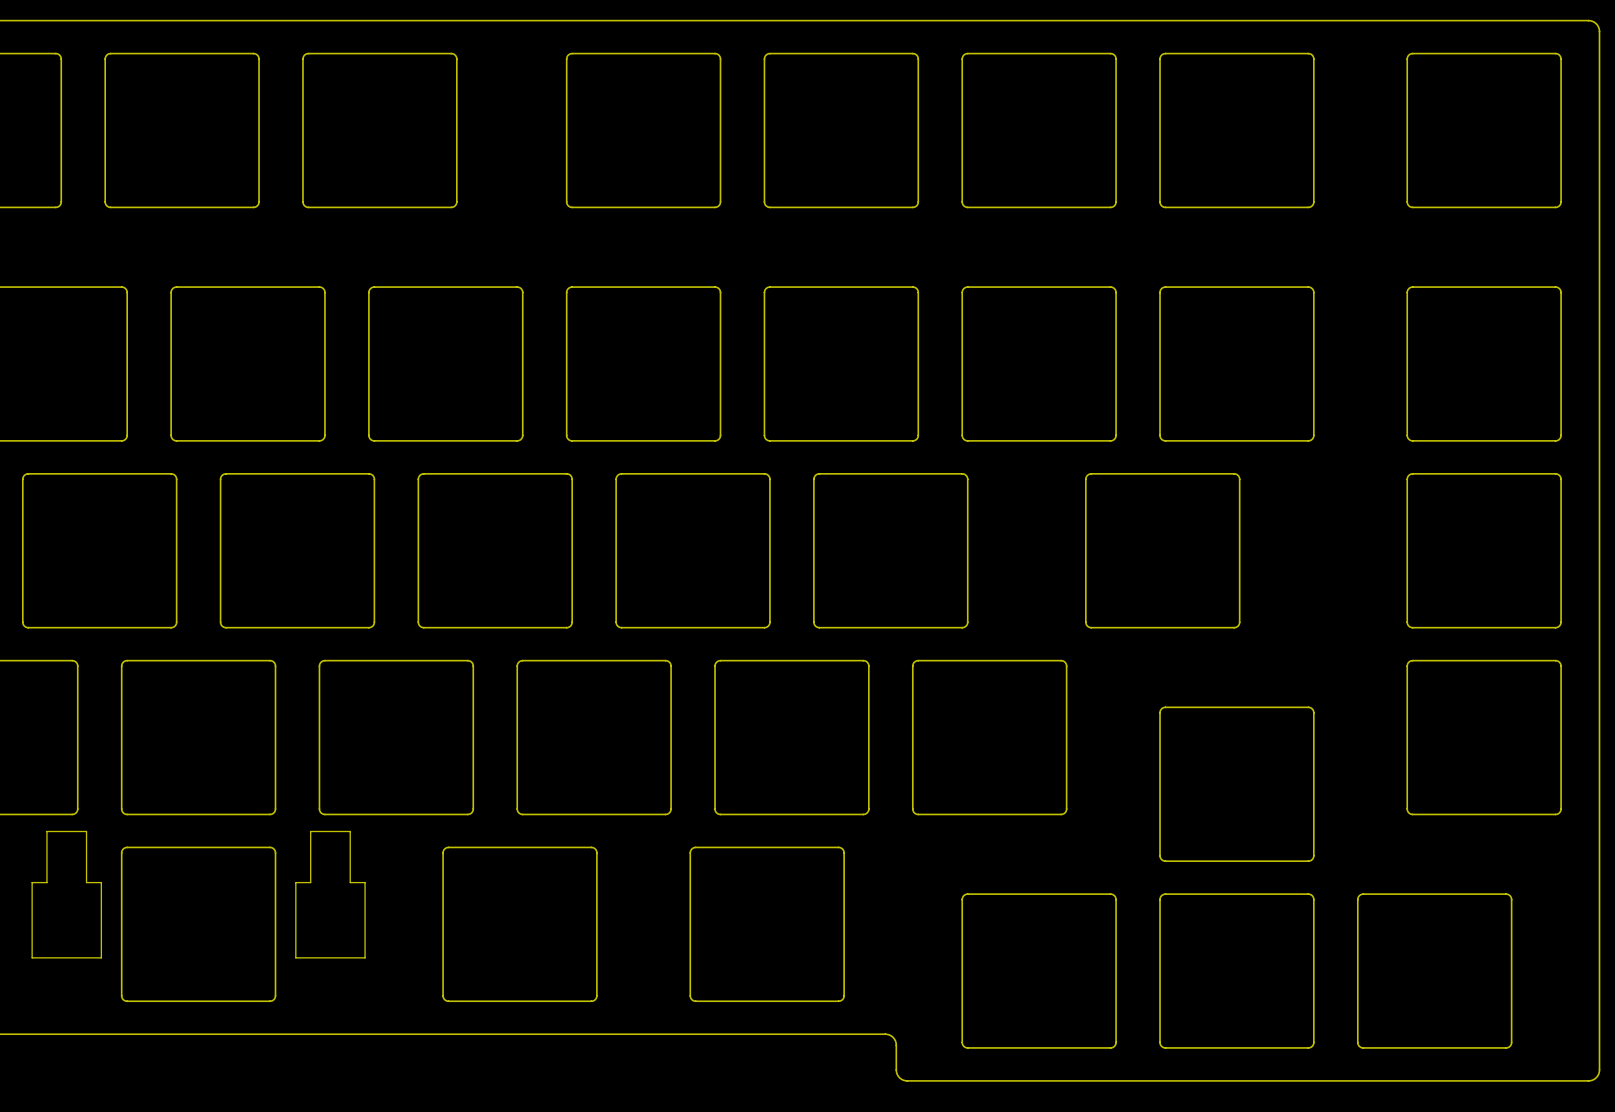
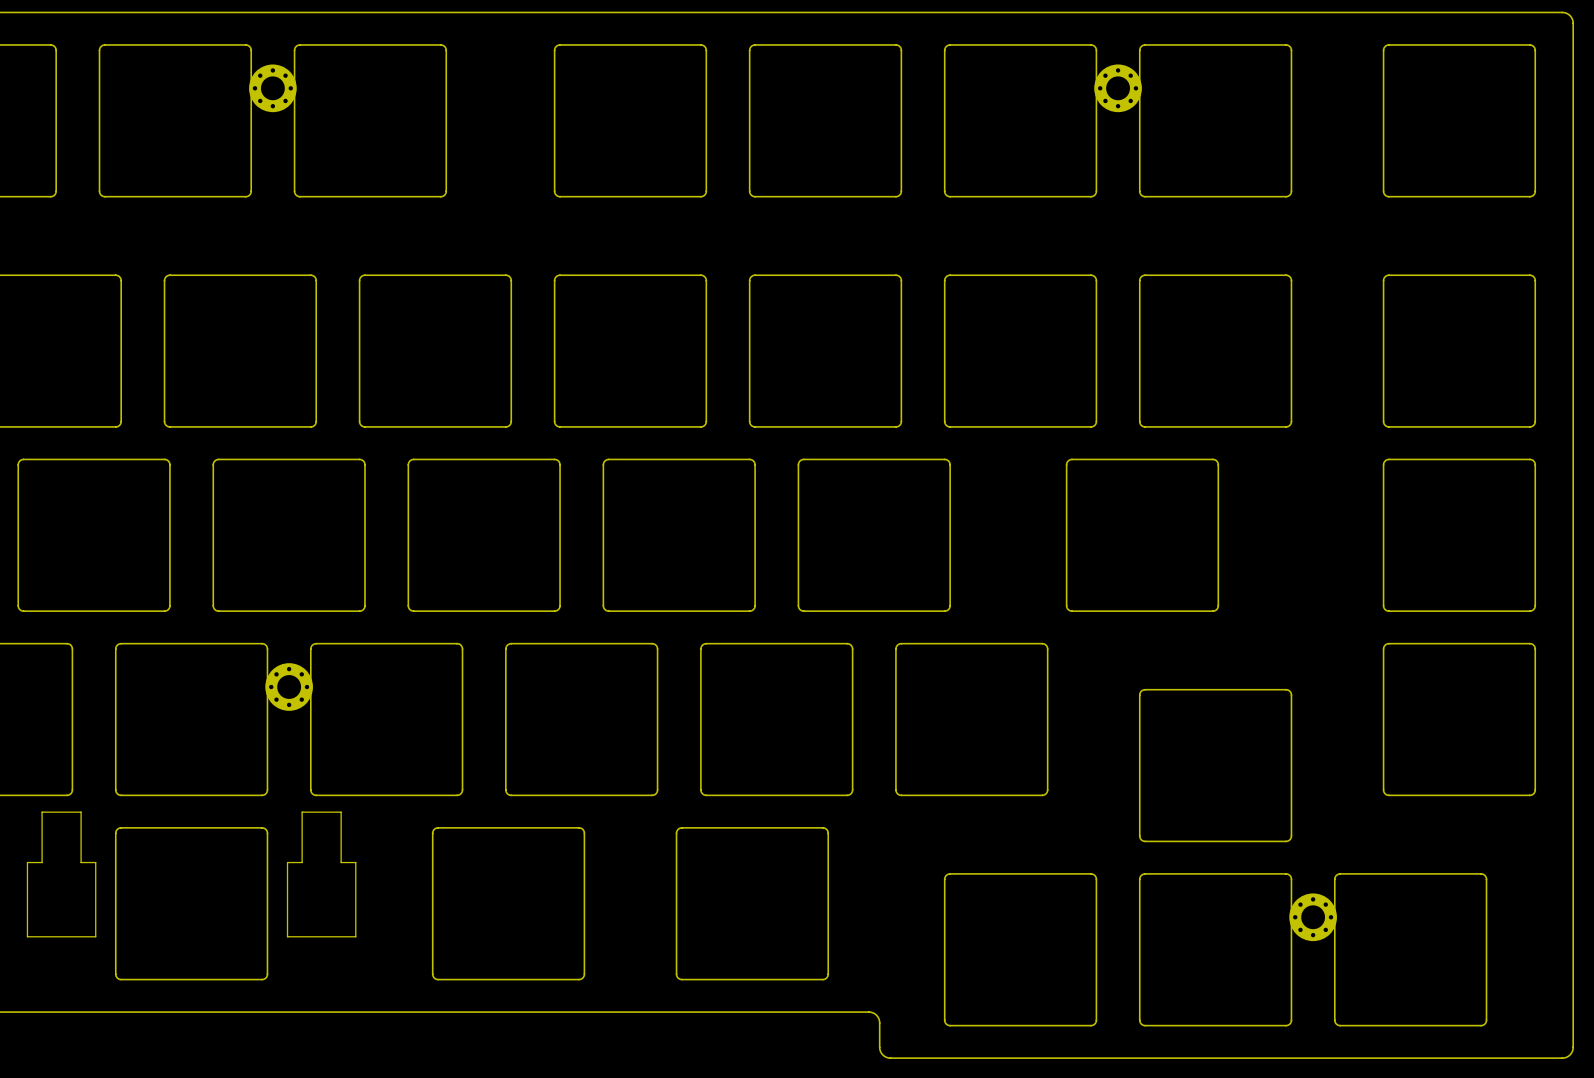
part: none -> (272, 88)
part: none -> (1118, 88)
part: none -> (289, 687)
part: none -> (1313, 917)

